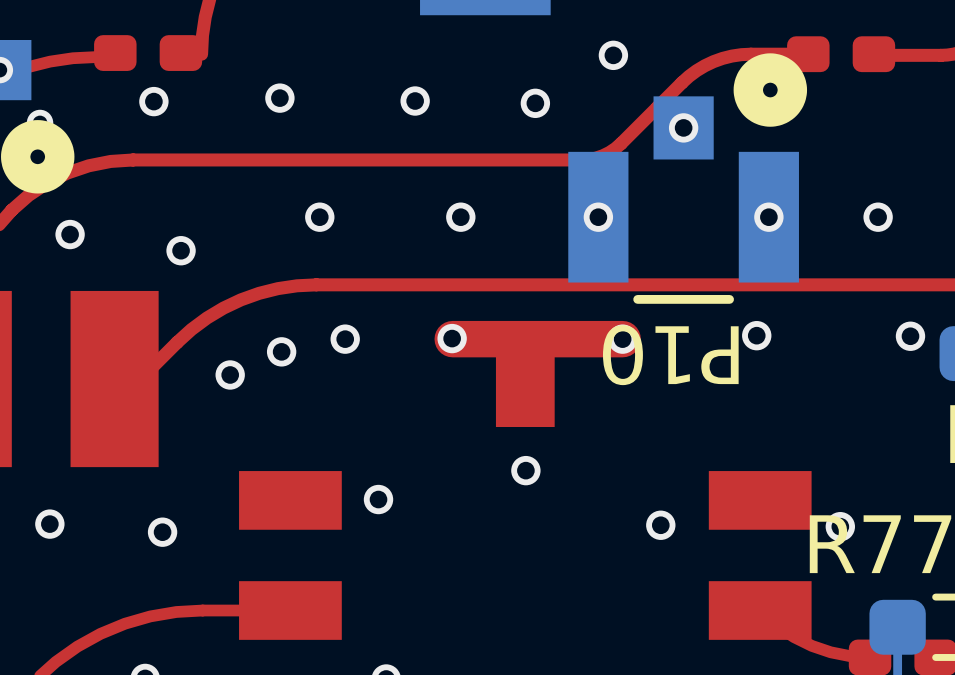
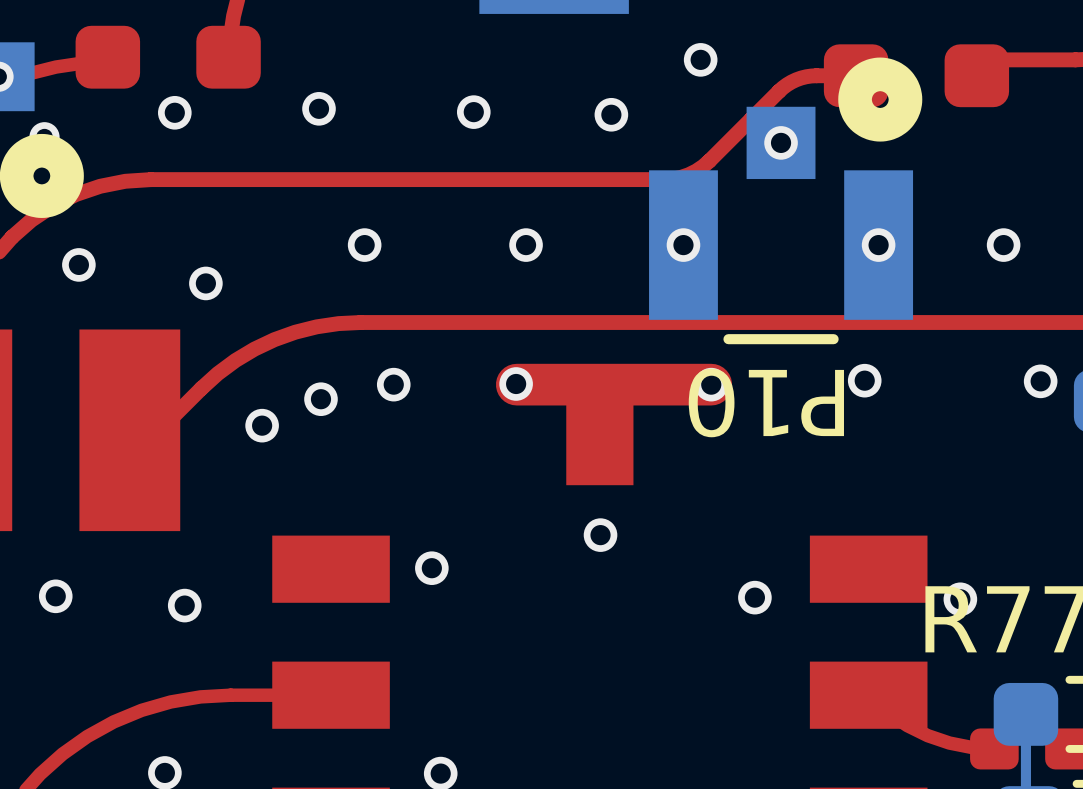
part footprint: [94, 35, 203, 71] -> [75, 25, 261, 89]
part footprint: [787, 36, 896, 73] -> [823, 44, 1010, 108]
top track: (808, 54) (731, 56) (704, 65) (681, 82) -> (856, 75) (806, 76) (791, 82) (779, 91)

